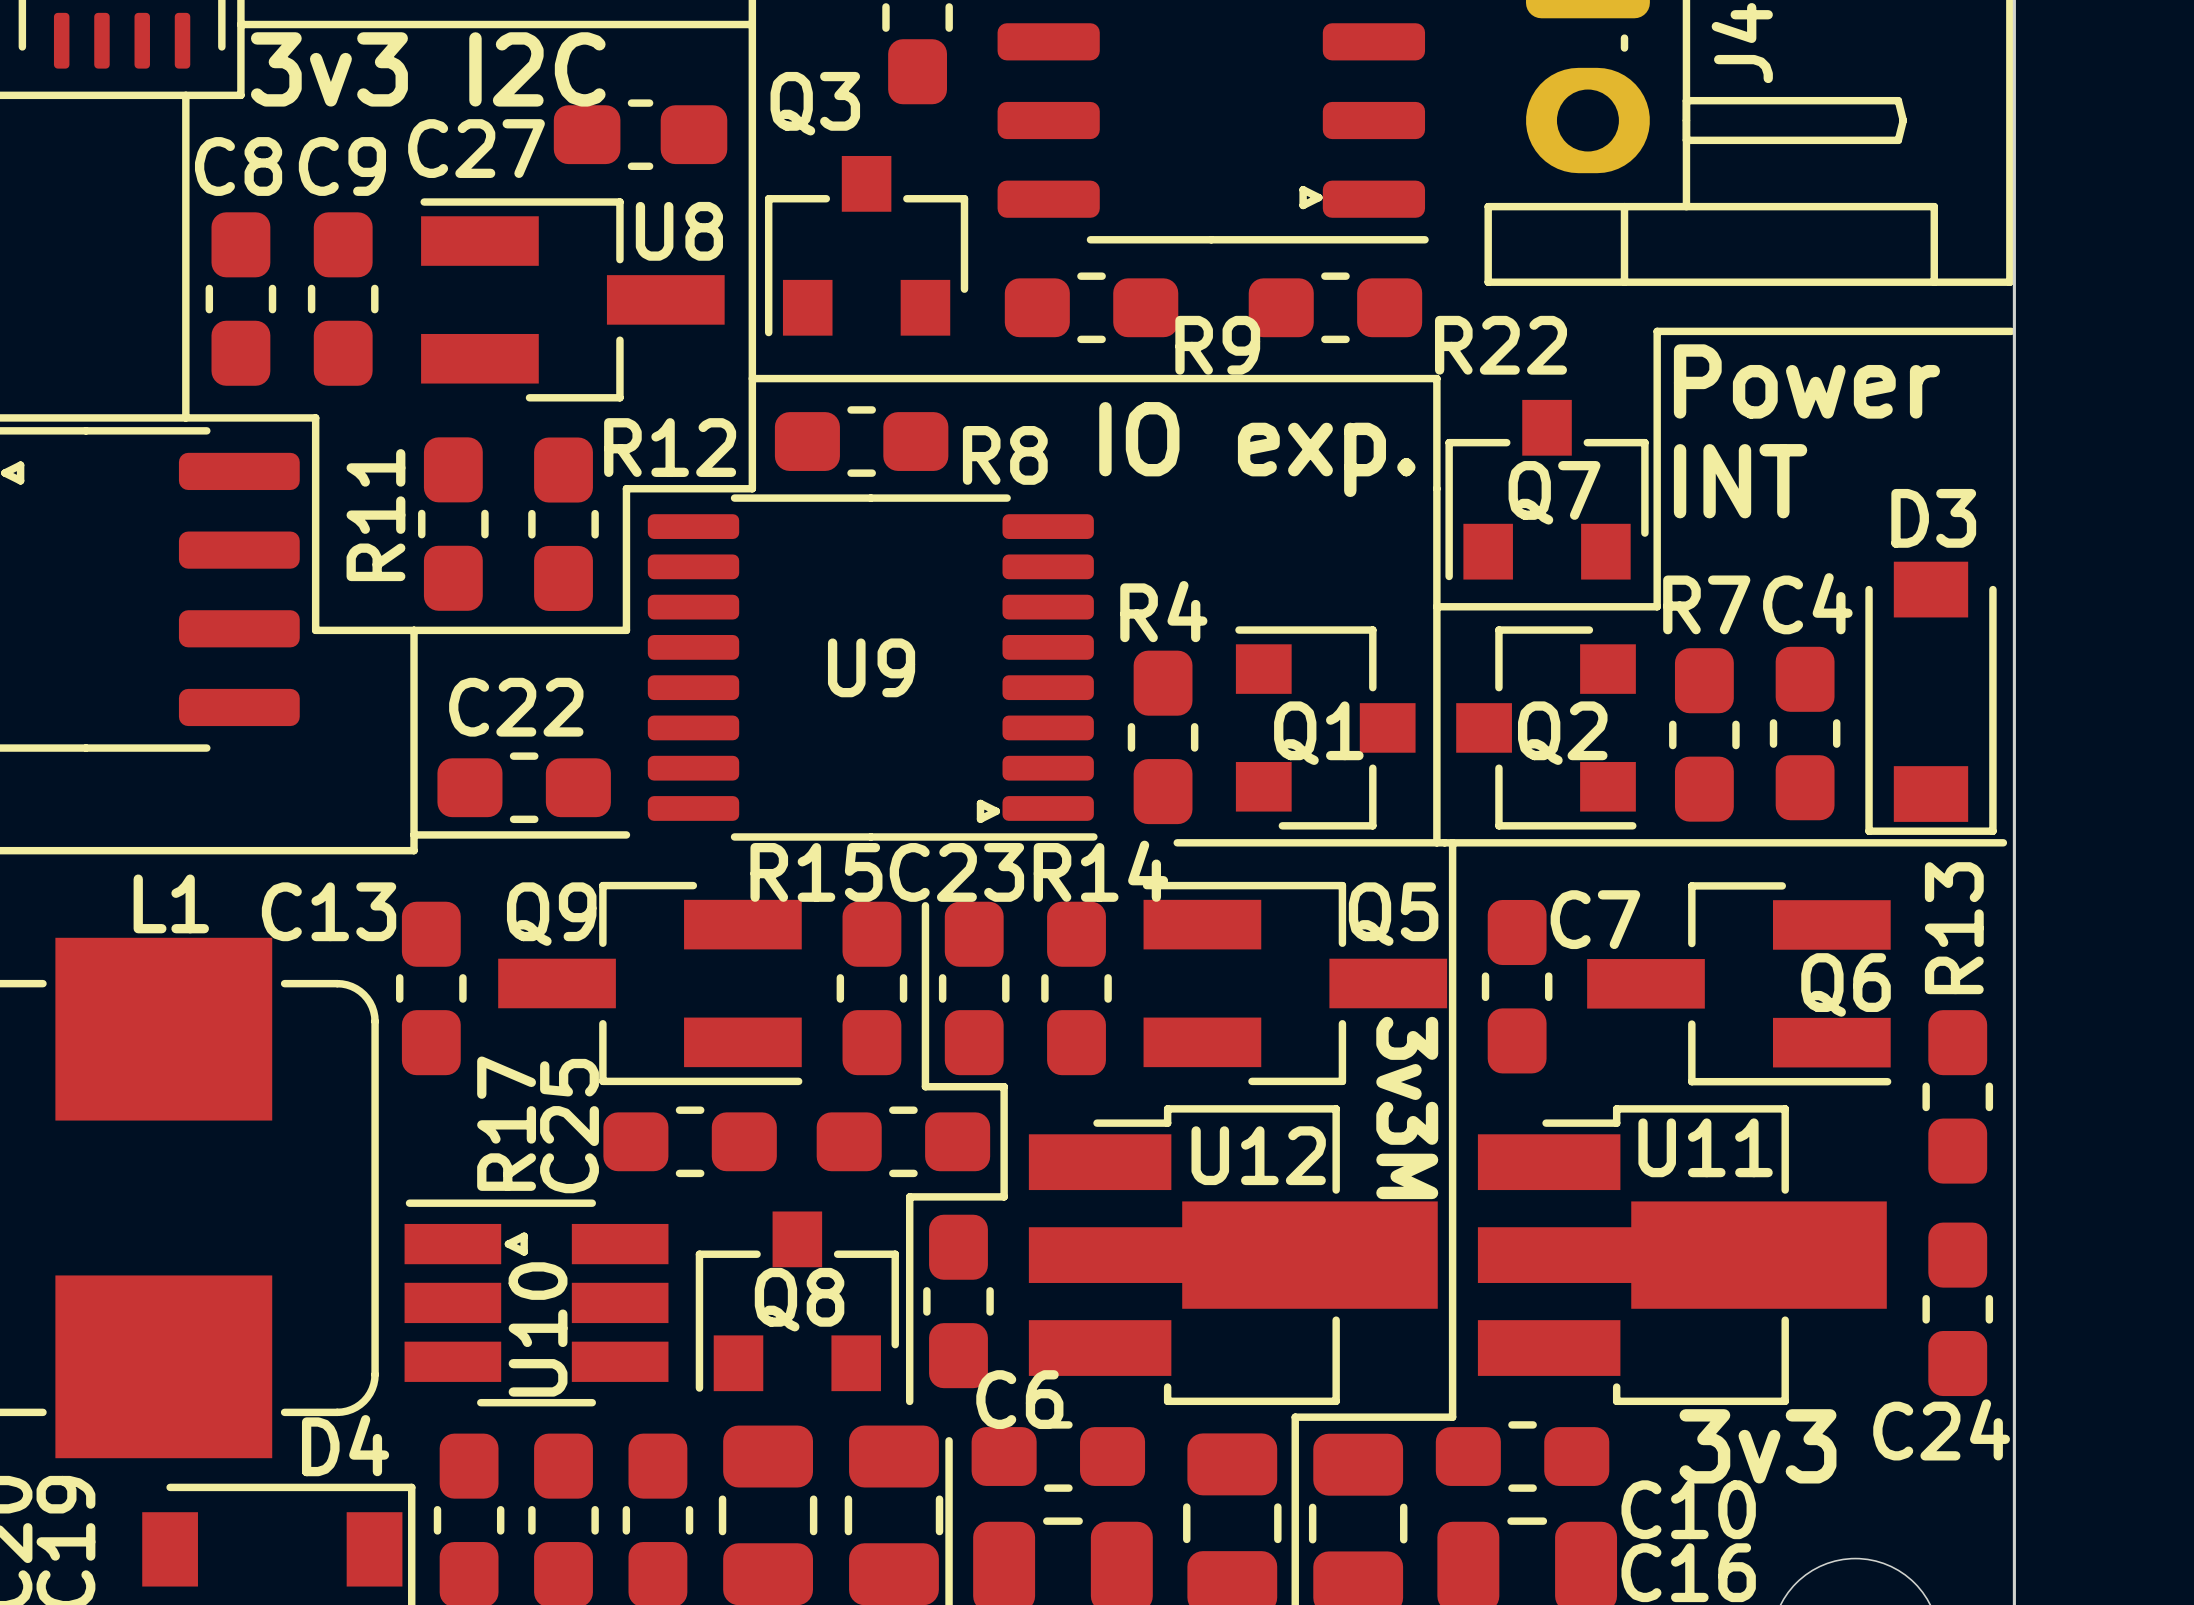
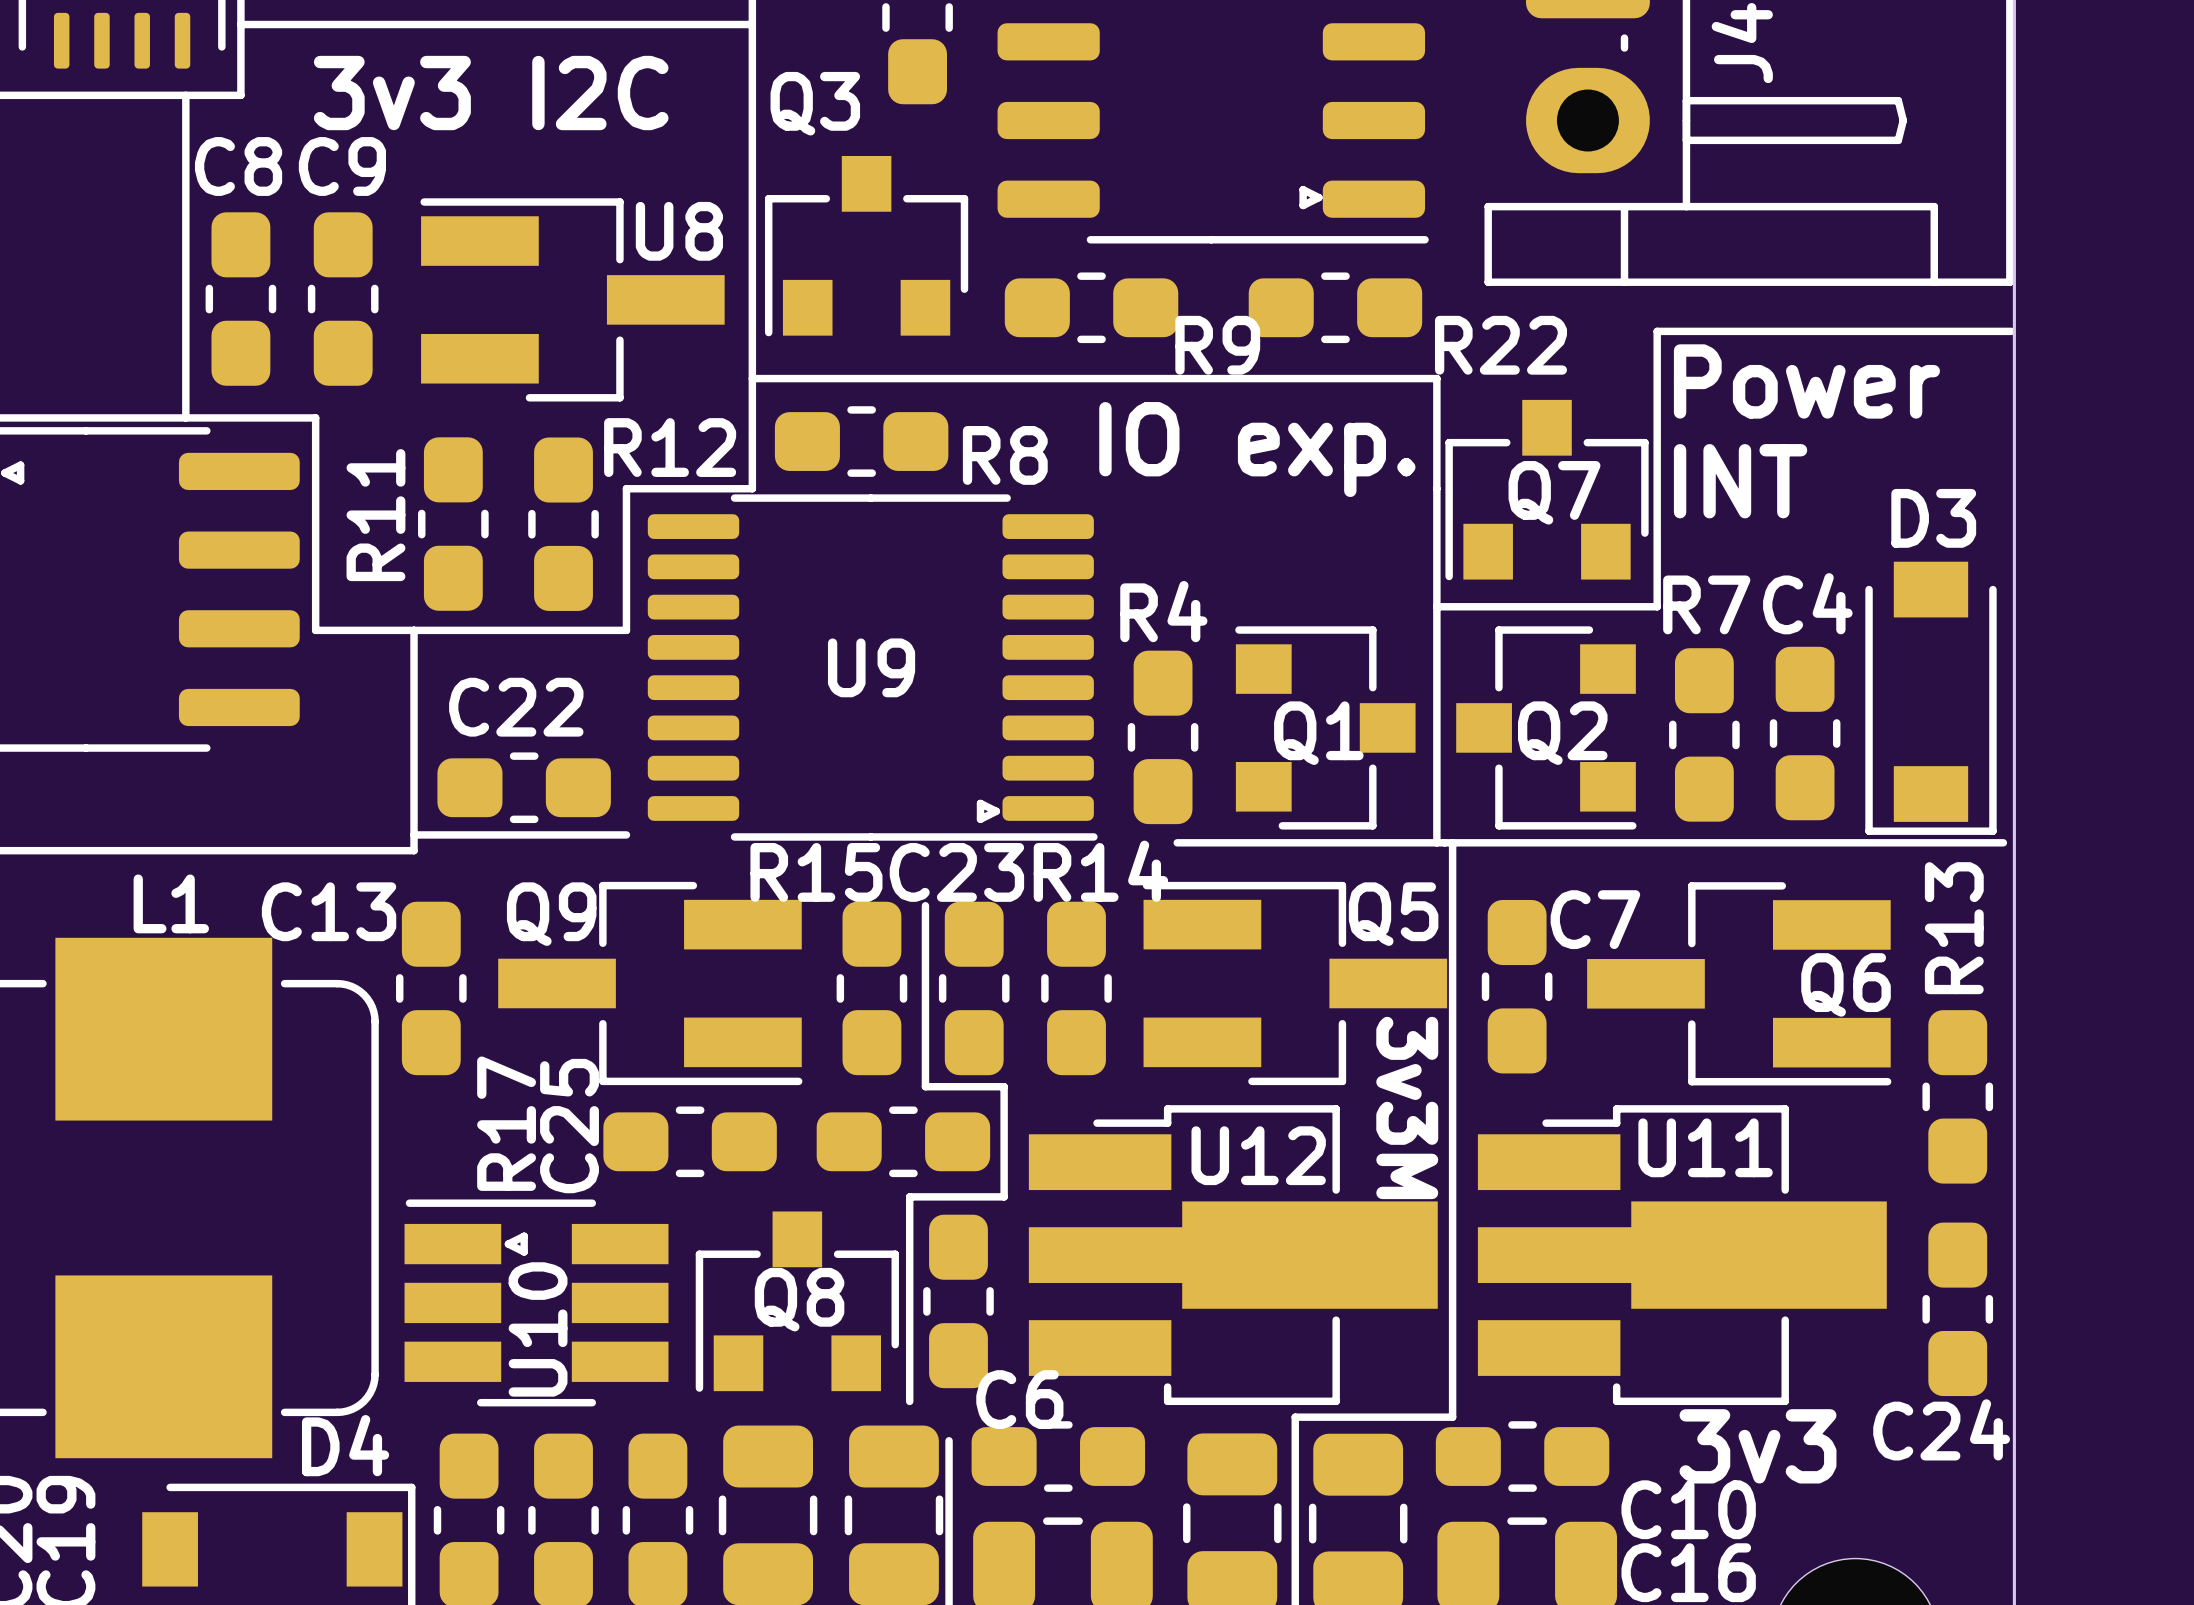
text position: 3v3 I2C (428, 69) -> 3v3 I2C (491, 93)
C27: (640, 134) -> none

